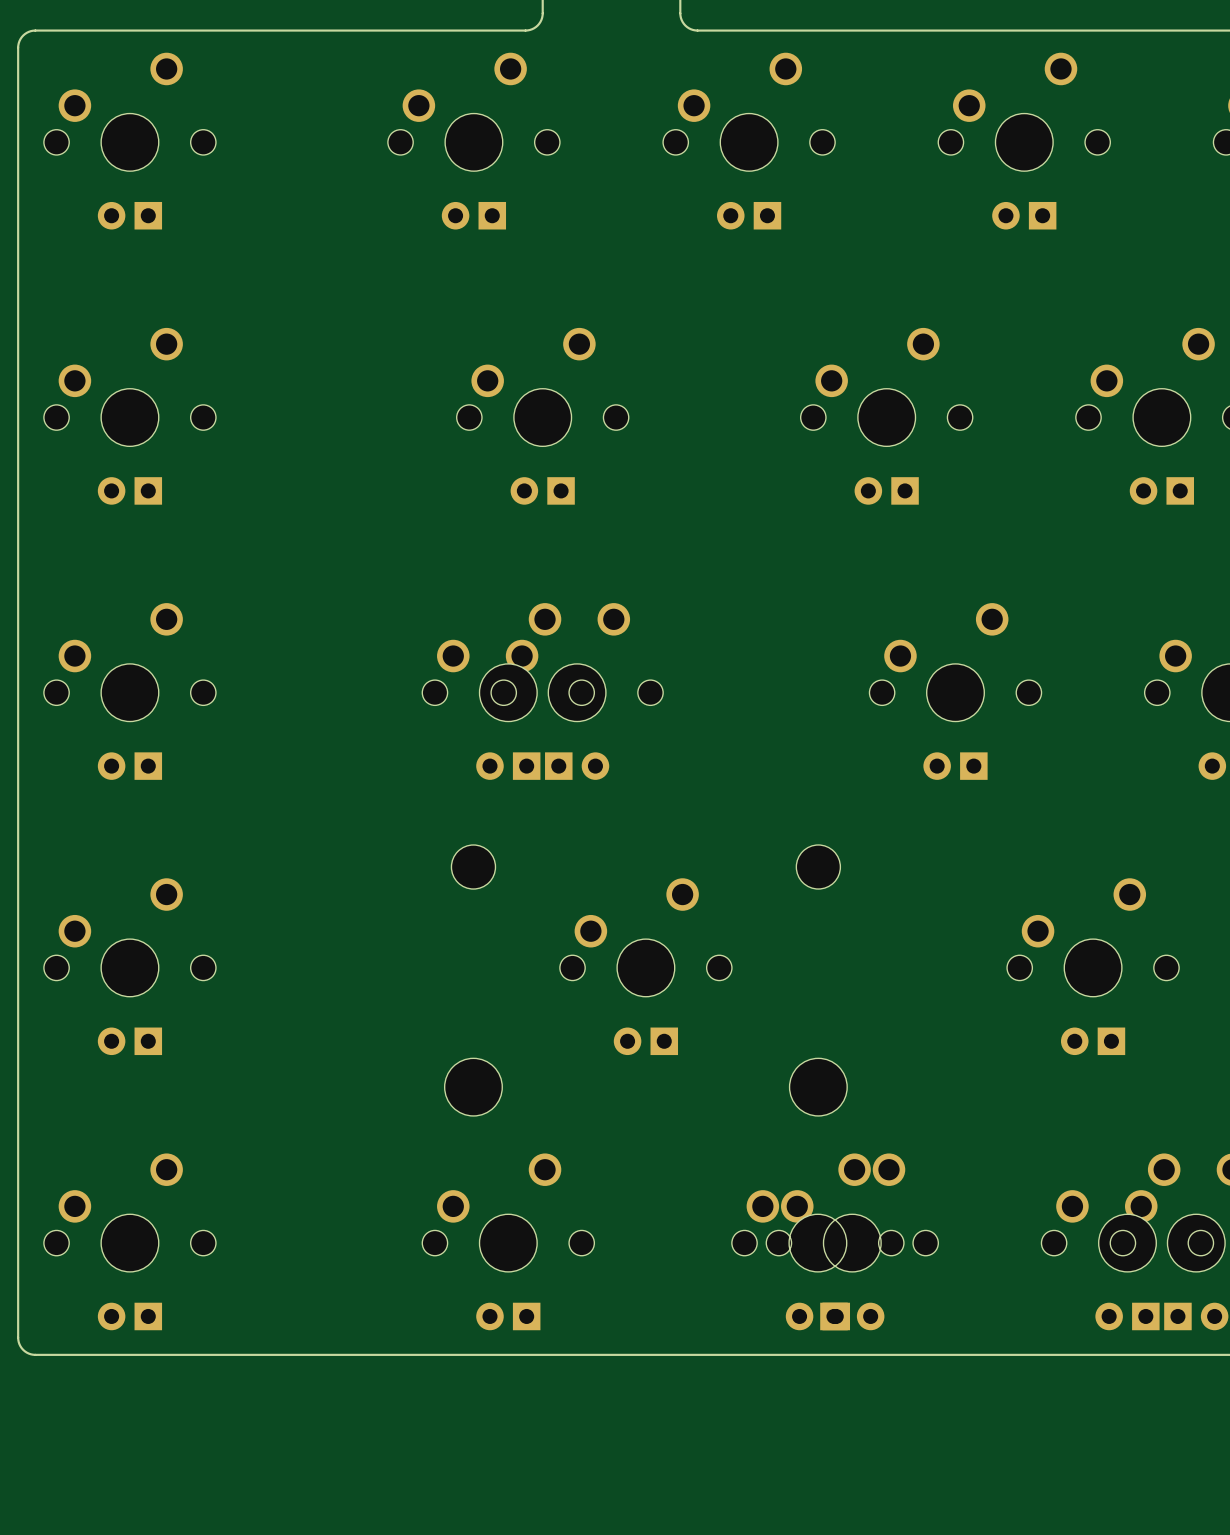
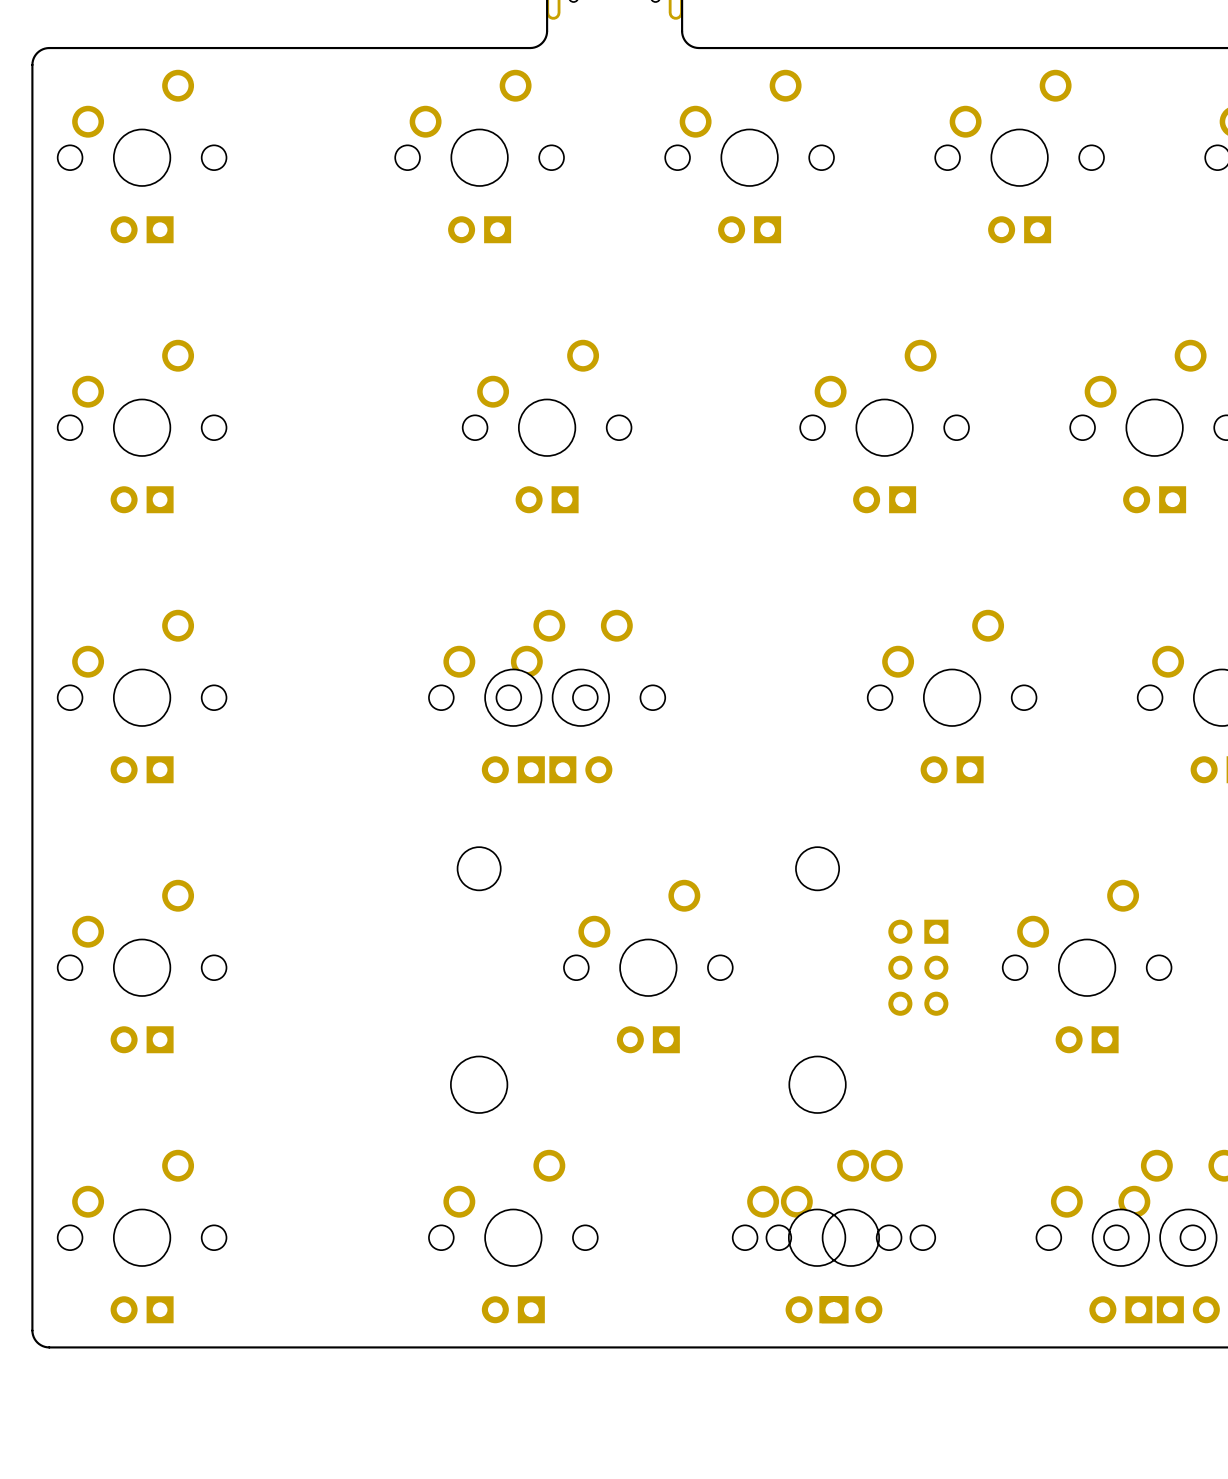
part: none -> (918, 967)

